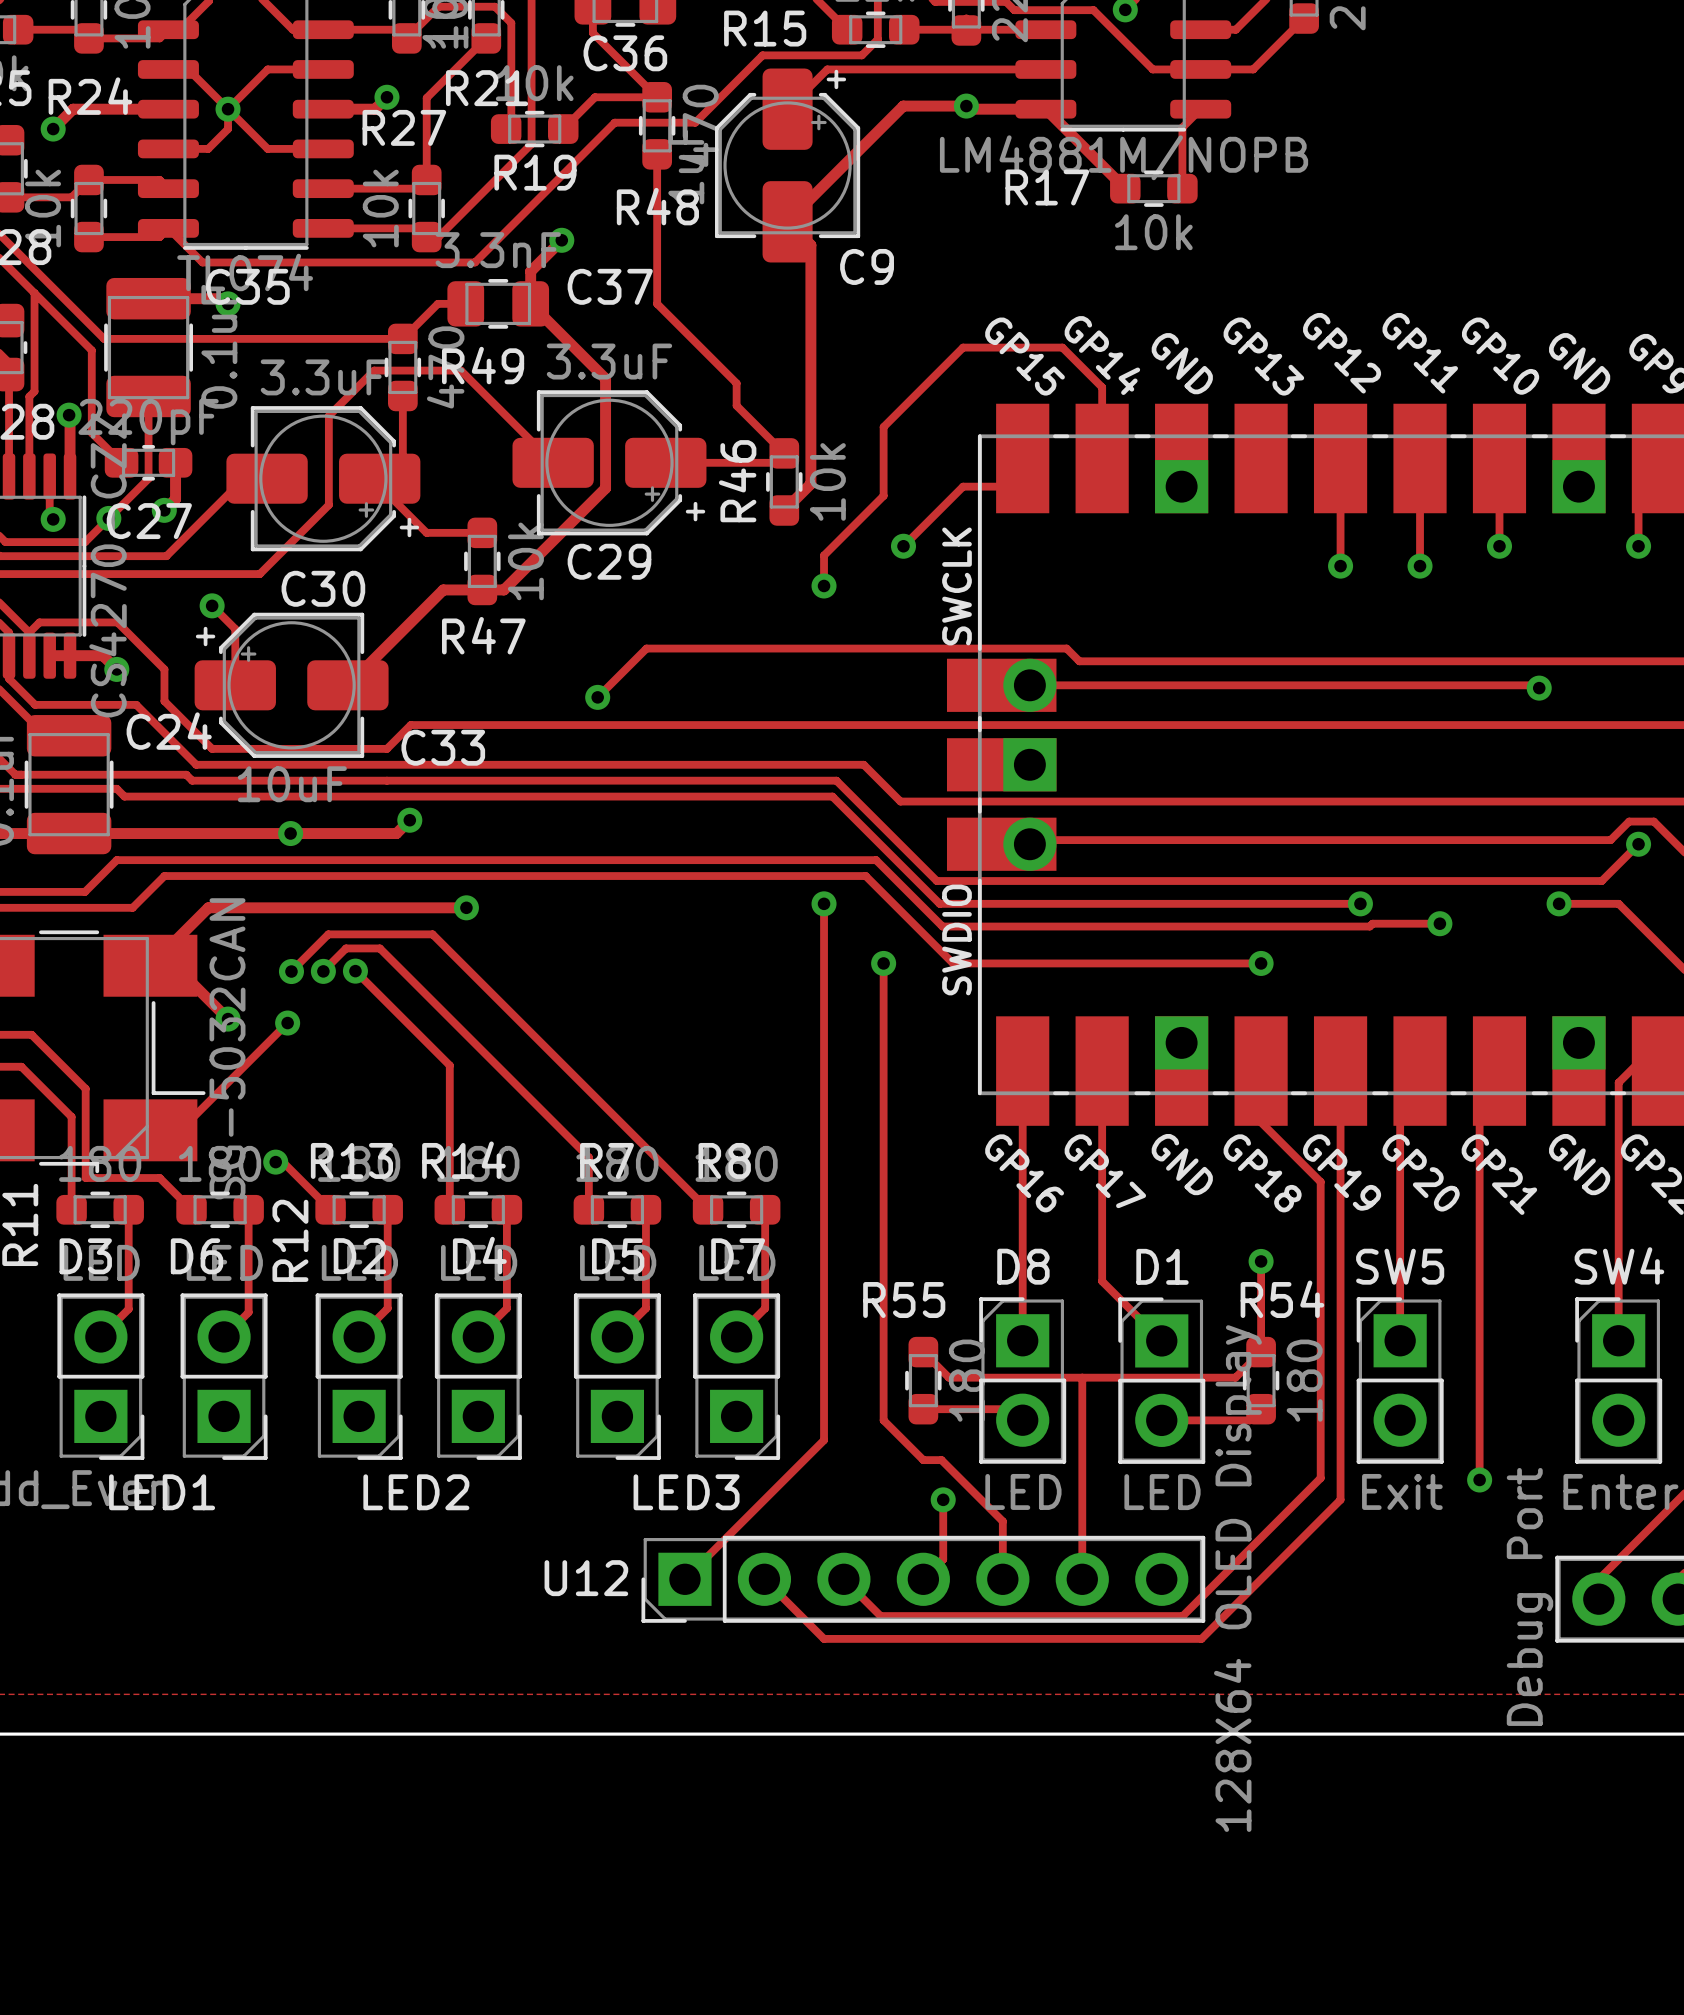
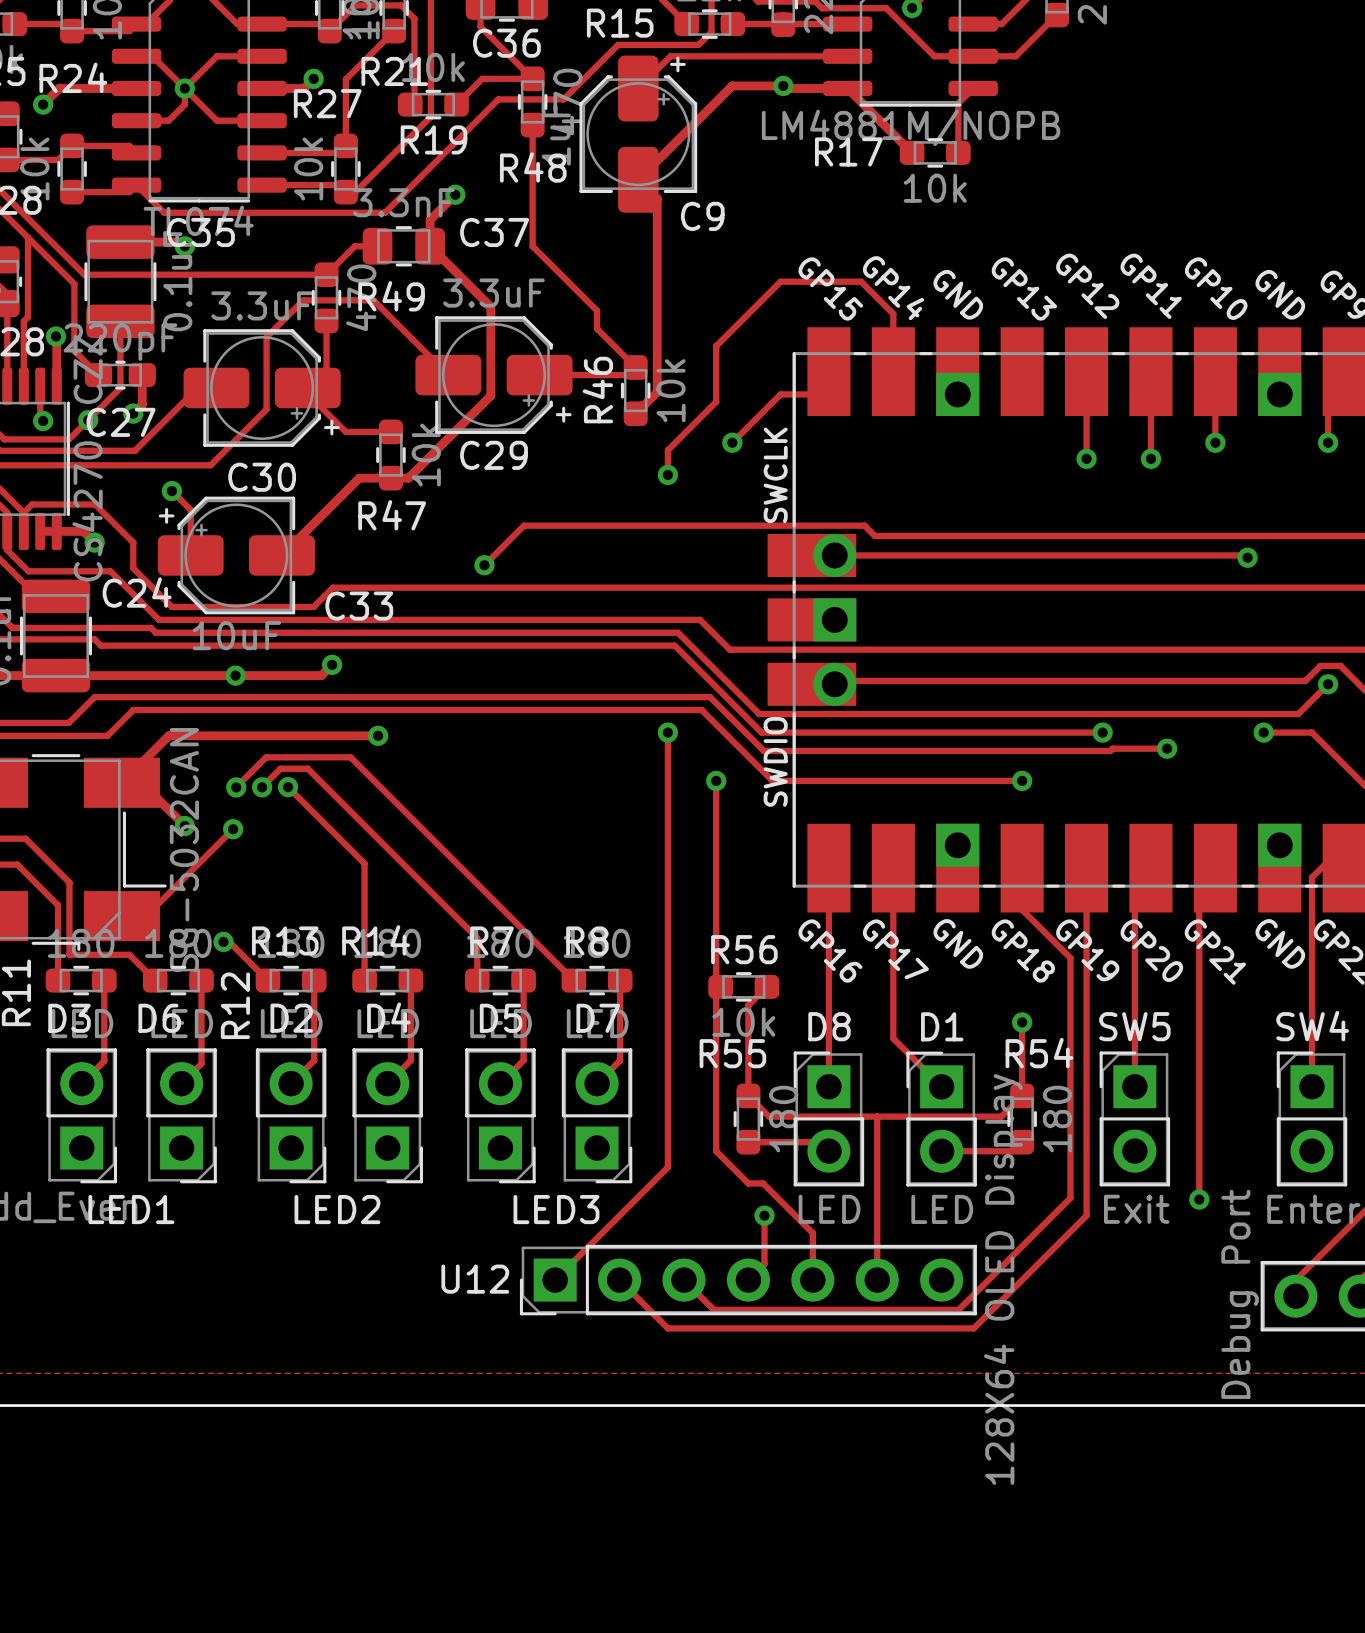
R56: none -> 10k (743, 986)
track: none -> (766, 986) (748, 1005) (748, 1095)

